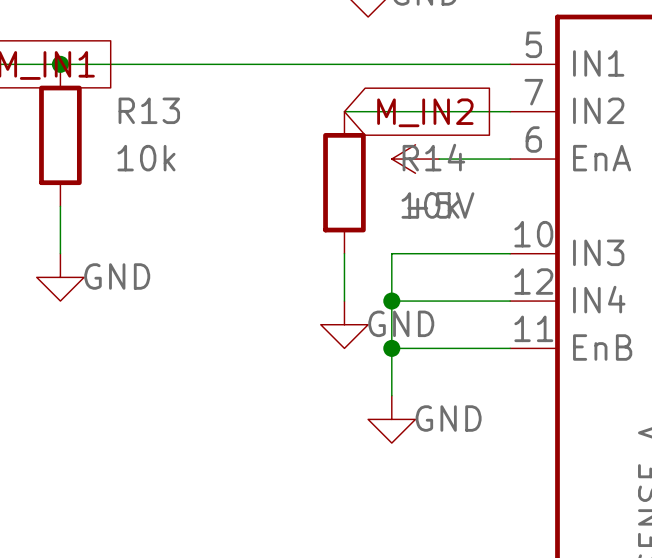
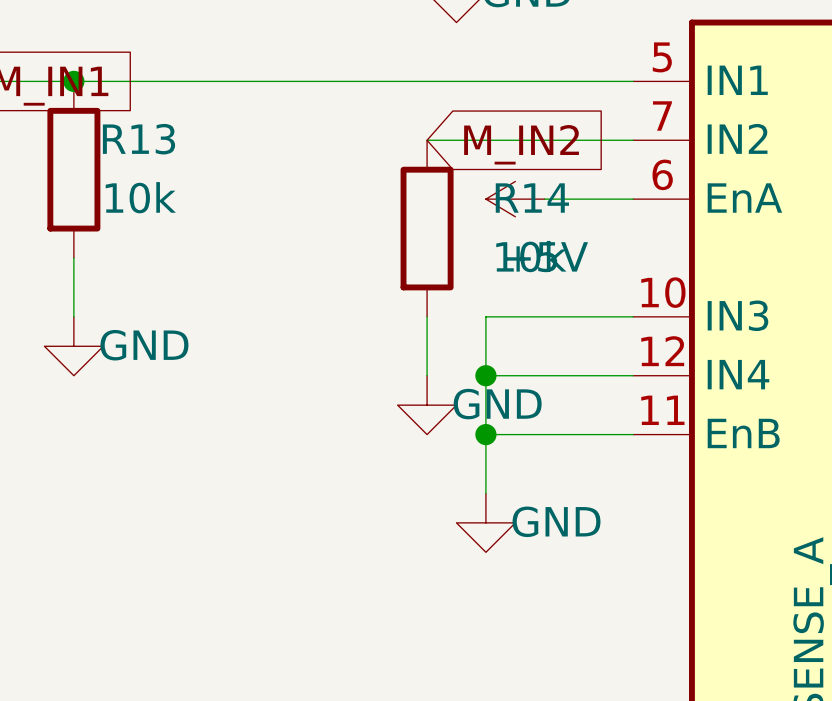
R13 name position: R13 (149, 110) -> R13 (139, 139)
R13 value position: 10k (146, 158) -> 10k (140, 197)

